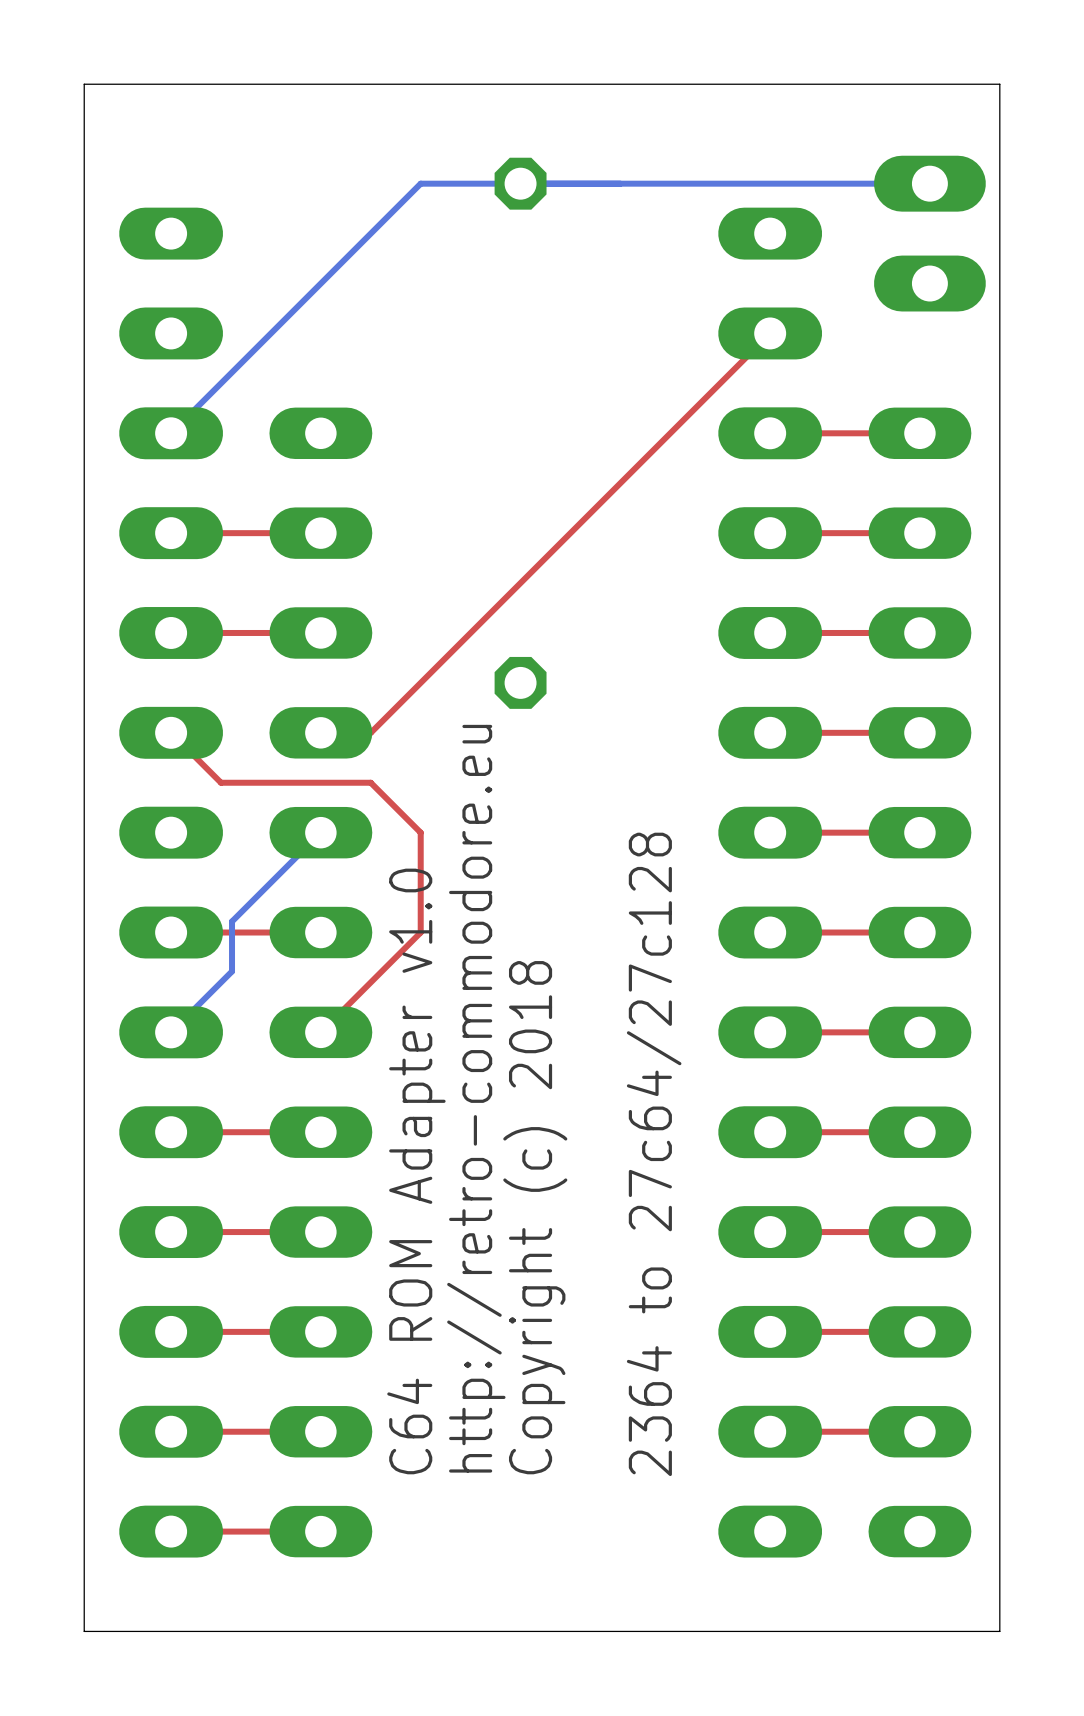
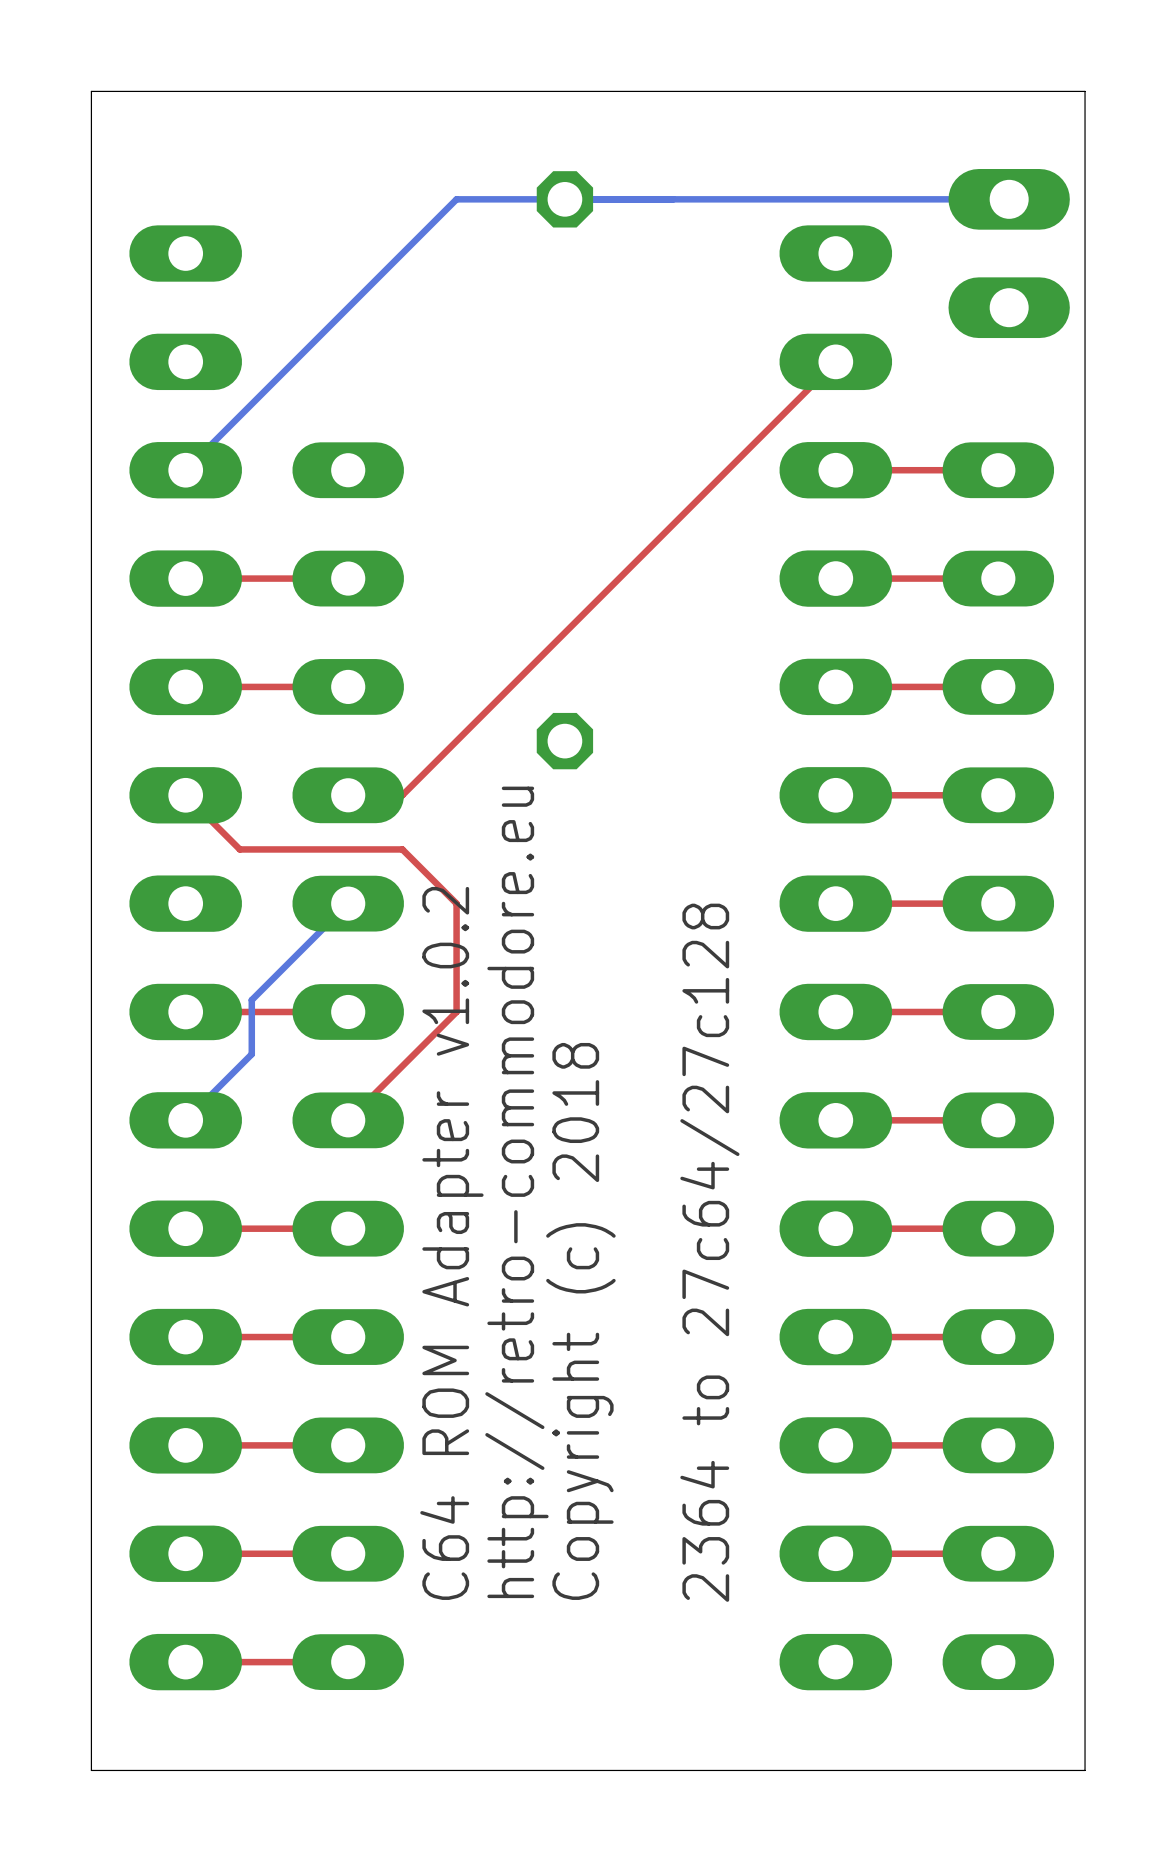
text: C64 ROM Adapter v1.0 (416, 1171) -> C64 ROM Adapter v1.0.2 (451, 1243)

